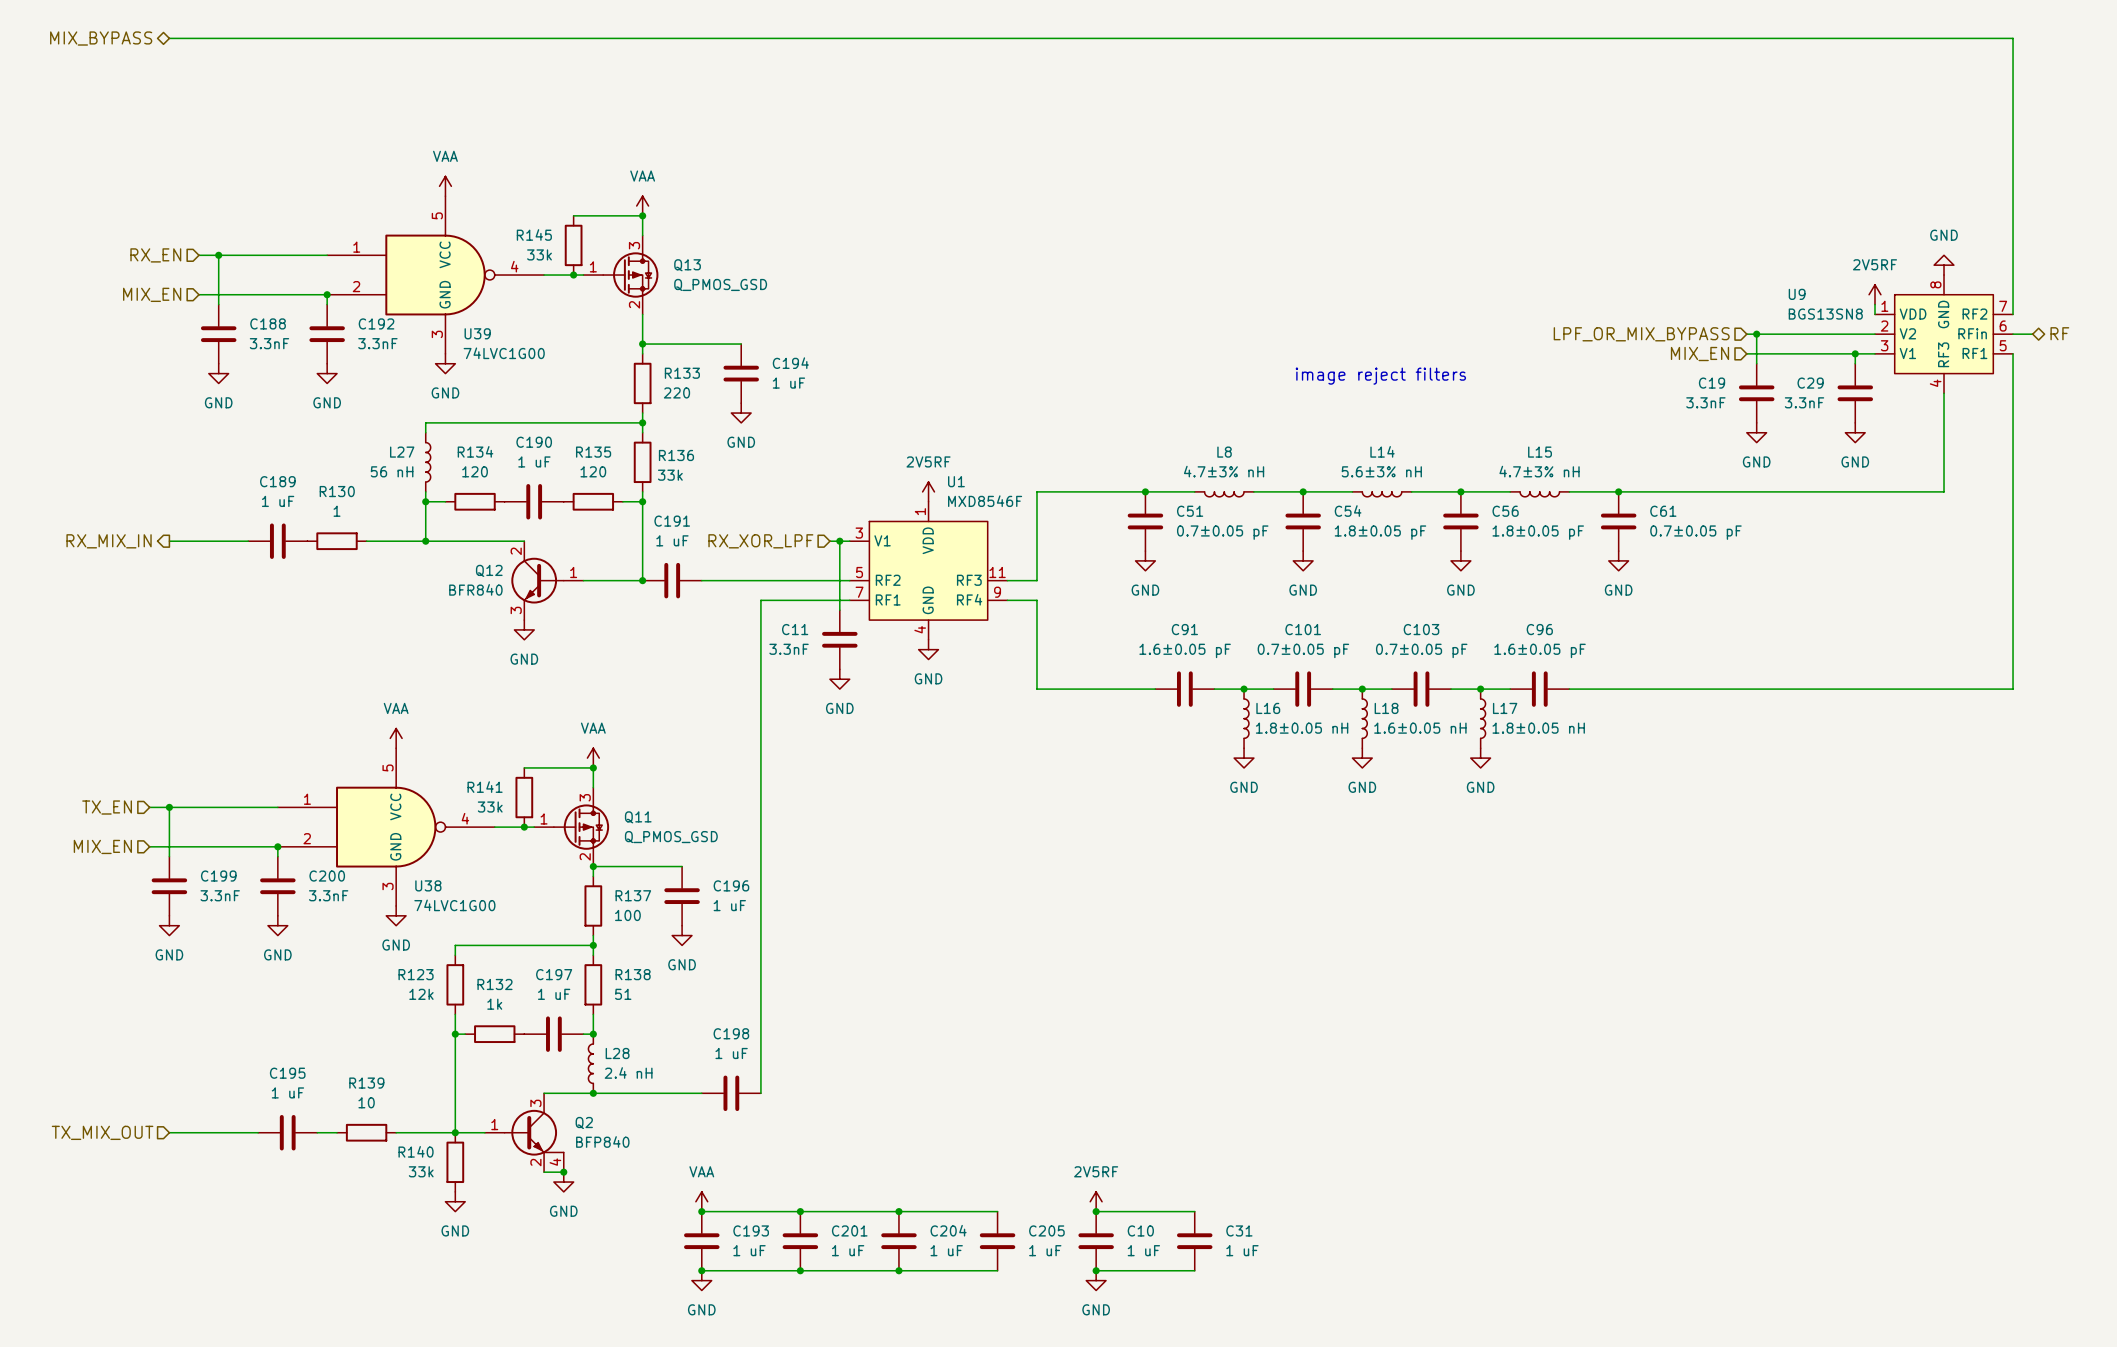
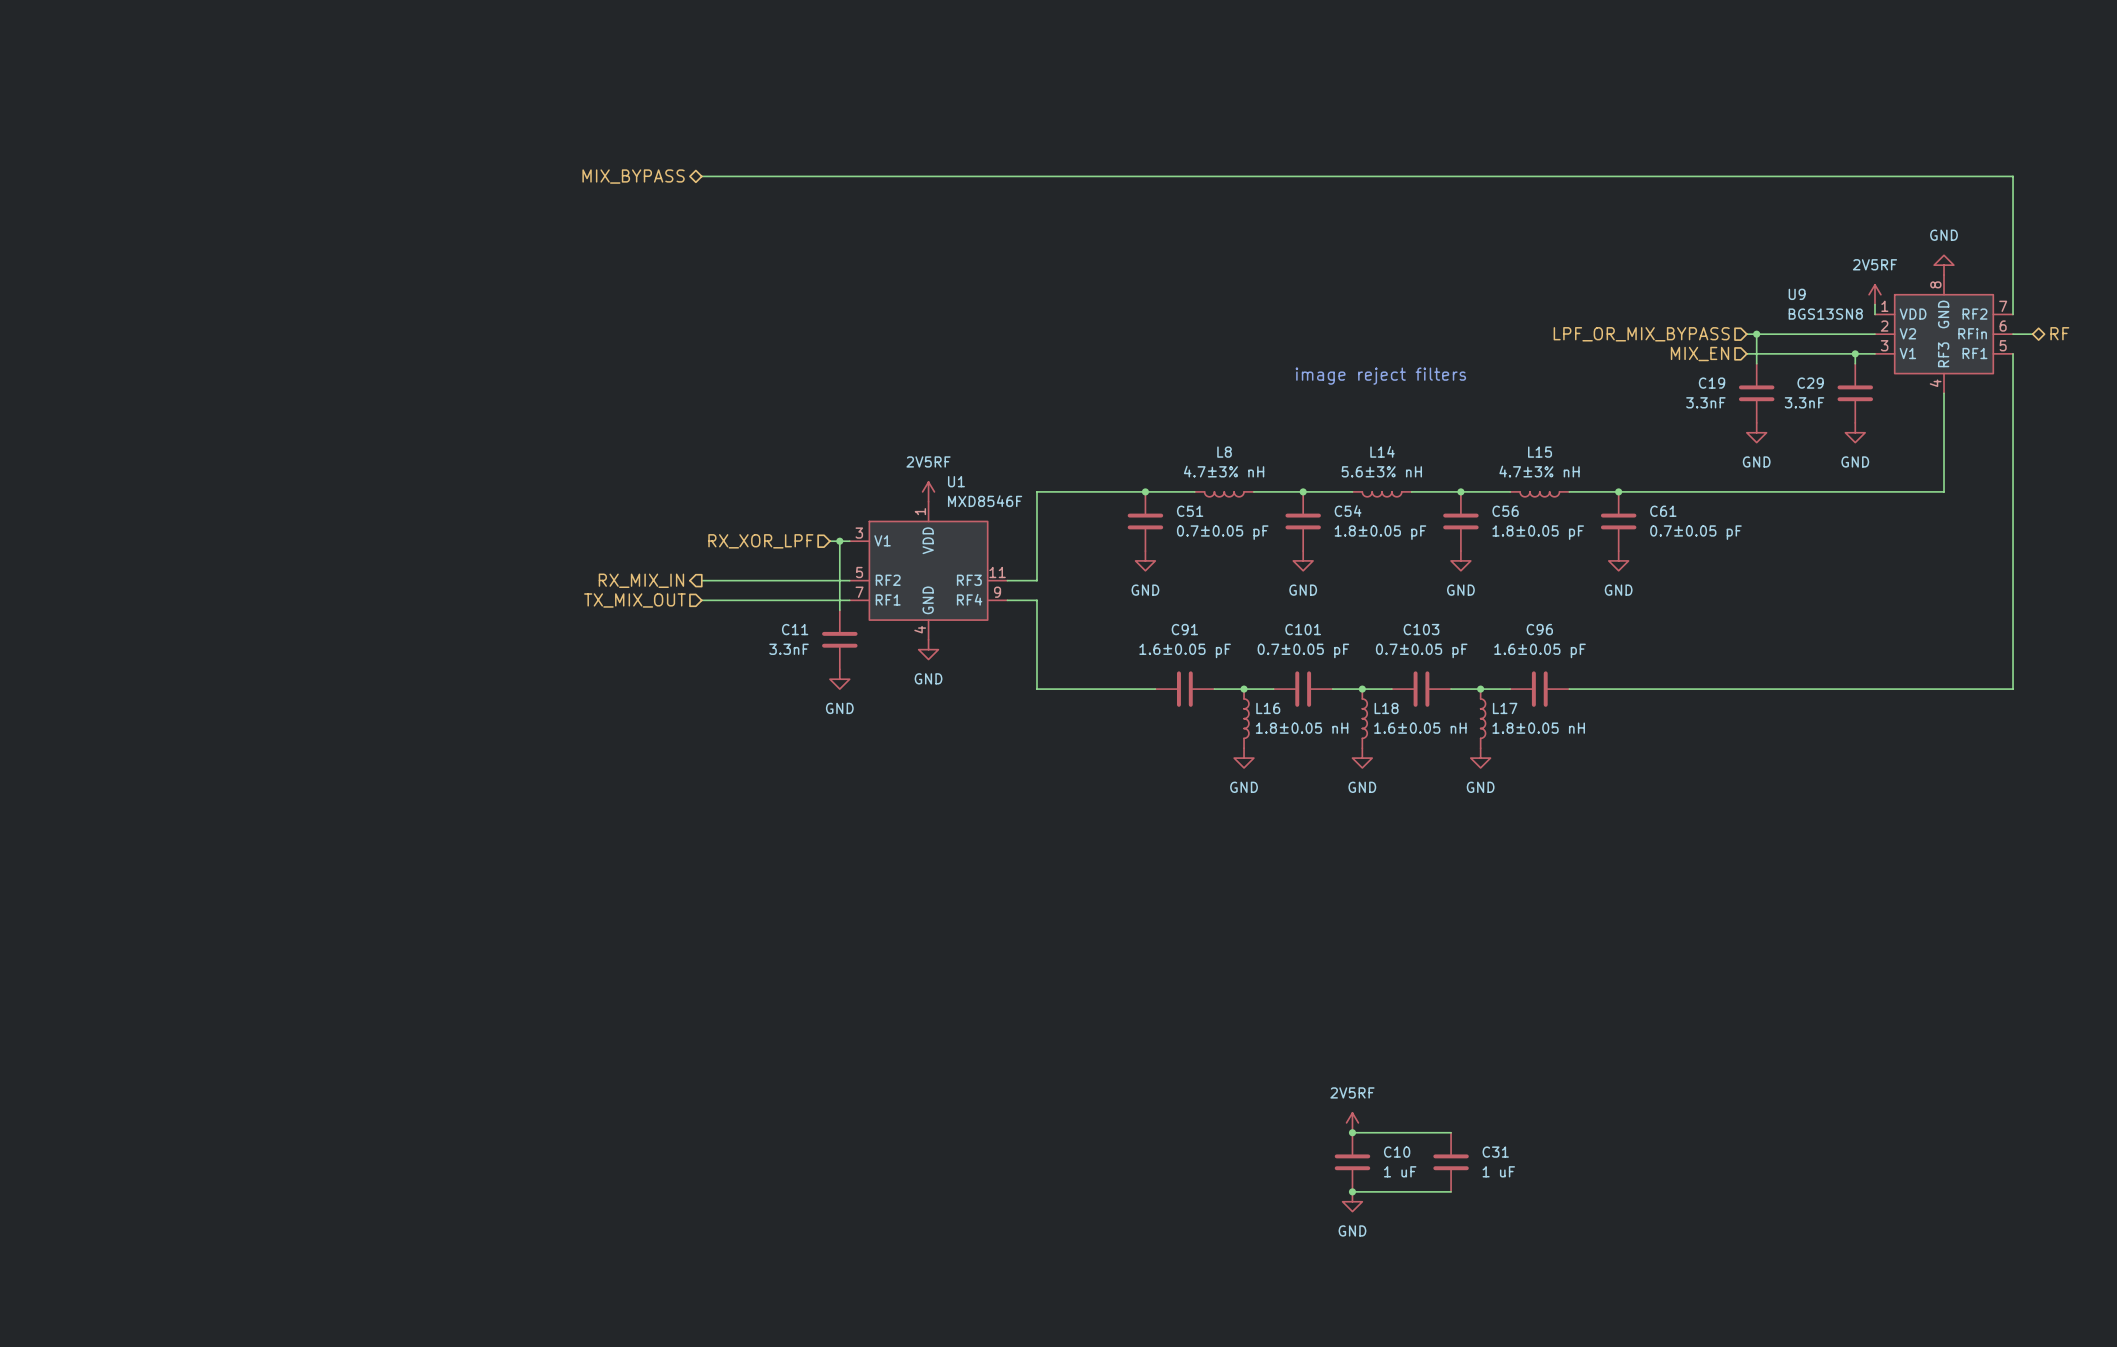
hierarchical label: MIX_BYPASS (101, 38) -> none
wire: (169, 38) (2013, 38) (2013, 176) -> (701, 176) (2013, 176)
hierarchical label: none -> MIX_BYPASS (633, 176)
power symbol: VAA (445, 186) -> none
power symbol: VAA (642, 206) -> none
wire: (573, 215) (642, 215) (642, 235) -> none
junction: (642, 215) -> none
R145: 33k (573, 245) -> none
hierarchical label: RX_EN (155, 255) -> none
wire: (198, 255) (327, 255) -> none
wire: (218, 255) (218, 304) -> none
junction: (218, 255) -> none
U39: 74LVC1G00 (435, 275) -> none
wire: (544, 275) (583, 275) -> none
junction: (573, 275) -> none
Q13: Q_PMOS_GSD (620, 275) -> none
hierarchical label: MIX_EN (152, 294) -> none
wire: (198, 294) (327, 294) (327, 304) -> none
junction: (327, 294) -> none
wire: (642, 314) (642, 353) -> none
C188: 3.3nF (218, 334) -> none
C192: 3.3nF (327, 334) -> none
wire: (642, 344) (741, 344) -> none
junction: (642, 344) -> none
power symbol: GND (445, 363) -> none
power symbol: GND (218, 373) -> none
power symbol: GND (327, 373) -> none
C194: 1 uF (741, 373) -> none
R133: 220 (642, 383) -> none
wire: (642, 413) (642, 432) -> none
power symbol: GND (741, 413) -> none
wire: (642, 422) (425, 422) (425, 432) -> none
junction: (642, 422) -> none
L27: 56 nH (428, 462) -> none
R136: 33k (642, 462) -> none
wire: (425, 491) (425, 541) -> none
wire: (642, 491) (642, 580) (583, 580) -> none
wire: (425, 501) (445, 501) -> none
junction: (425, 501) -> none
R134: 120 (475, 501) -> none
C190: 1 uF (534, 501) -> none
R135: 120 (593, 501) -> none
wire: (622, 501) (642, 501) -> none
junction: (642, 501) -> none
hierarchical label: RX_MIX_IN (109, 541) -> none
wire: (169, 541) (248, 541) -> none
C189: 1 uF (277, 541) -> none
R130: 1 (337, 541) -> none
wire: (366, 541) (524, 541) -> none
junction: (425, 541) -> none
Q12: BFR840 (547, 580) -> none
hierarchical label: none -> RX_MIX_IN (641, 580)
junction: (642, 580) -> none
C191: 1 uF (672, 580) -> none
hierarchical label: none -> TX_MIX_OUT (634, 600)
wire: (760, 600) (760, 1093) -> (760, 600) (701, 600)
power symbol: GND (524, 629) -> none
power symbol: VAA (396, 738) -> none
power symbol: VAA (593, 758) -> none
wire: (524, 767) (593, 767) (593, 787) -> none
junction: (593, 767) -> none
R141: 33k (524, 797) -> none
hierarchical label: TX_EN (107, 807) -> none
wire: (149, 807) (277, 807) -> none
wire: (169, 807) (169, 856) -> none
junction: (169, 807) -> none
U38: 74LVC1G00 (386, 827) -> none
wire: (494, 827) (534, 827) -> none
junction: (524, 827) -> none
Q11: Q_PMOS_GSD (571, 827) -> none
hierarchical label: MIX_EN (102, 846) -> none
wire: (149, 846) (277, 846) (277, 856) -> none
junction: (277, 846) -> none
junction: (593, 866) -> none
wire: (682, 866) (593, 866) (593, 876) -> none
C199: 3.3nF (169, 886) -> none
C200: 3.3nF (277, 886) -> none
C196: 1 uF (682, 896) -> none
R137: 100 (593, 905) -> none
power symbol: GND (396, 915) -> none
power symbol: GND (169, 925) -> none
power symbol: GND (277, 925) -> none
wire: (593, 935) (593, 955) -> none
power symbol: GND (682, 935) -> none
wire: (593, 945) (455, 945) (455, 955) -> none
junction: (593, 945) -> none
R123: 12k (455, 984) -> none
R138: 51 (593, 984) -> none
wire: (455, 1014) (455, 1132) -> none
wire: (593, 1014) (593, 1034) (583, 1034) -> none
wire: (455, 1034) (465, 1034) -> none
junction: (455, 1034) -> none
R132: 1k (494, 1034) -> none
C197: 1 uF (553, 1034) -> none
junction: (593, 1034) -> none
L28: 2.4 nH (590, 1063) -> none
wire: (544, 1093) (701, 1093) -> none
junction: (593, 1093) -> none
C198: 1 uF (731, 1093) -> none
power symbol: none -> 2V5RF (1352, 1122)
hierarchical label: TX_MIX_OUT (102, 1132) -> none
wire: (169, 1132) (258, 1132) -> none
C195: 1 uF (287, 1132) -> none
wire: (317, 1132) (337, 1132) -> none
R139: 10 (366, 1132) -> none
wire: (396, 1132) (484, 1132) -> none
junction: (455, 1132) -> none
Q2: BFP840 (524, 1132) -> none
wire: none -> (1352, 1132) (1451, 1132)
junction: none -> (1352, 1132)
R140: 33k (455, 1162) -> none
wire: (544, 1172) (563, 1172) -> none
junction: (563, 1172) -> none
power symbol: GND (563, 1182) -> none
wire: none -> (1352, 1191) (1451, 1191)
junction: none -> (1352, 1191)
power symbol: GND (455, 1201) -> none
power symbol: VAA (701, 1201) -> none
power symbol: 2V5RF (1096, 1201) -> none
power symbol: none -> GND (1352, 1201)
wire: (701, 1211) (997, 1211) -> none
junction: (701, 1211) -> none
junction: (800, 1211) -> none
junction: (898, 1211) -> none
wire: (1096, 1211) (1194, 1211) -> none
junction: (1096, 1211) -> none
C193: 1 uF (701, 1241) -> none
C201: 1 uF (800, 1241) -> none
C204: 1 uF (898, 1241) -> none
C205: 1 uF (997, 1241) -> none
C10 position: (1096, 1241) -> (1352, 1162)
C31 position: (1194, 1241) -> (1451, 1162)
wire: (701, 1270) (997, 1270) -> none
junction: (701, 1270) -> none
junction: (800, 1270) -> none
junction: (898, 1270) -> none
wire: (1096, 1270) (1194, 1270) -> none
junction: (1096, 1270) -> none
power symbol: GND (701, 1280) -> none
power symbol: GND (1096, 1280) -> none

